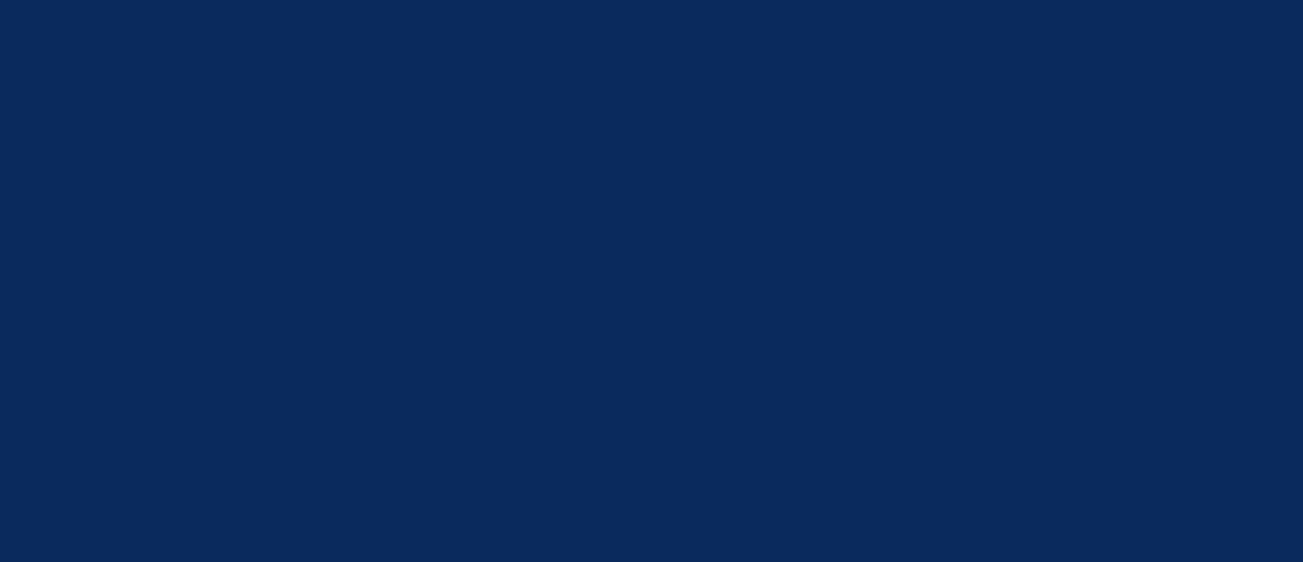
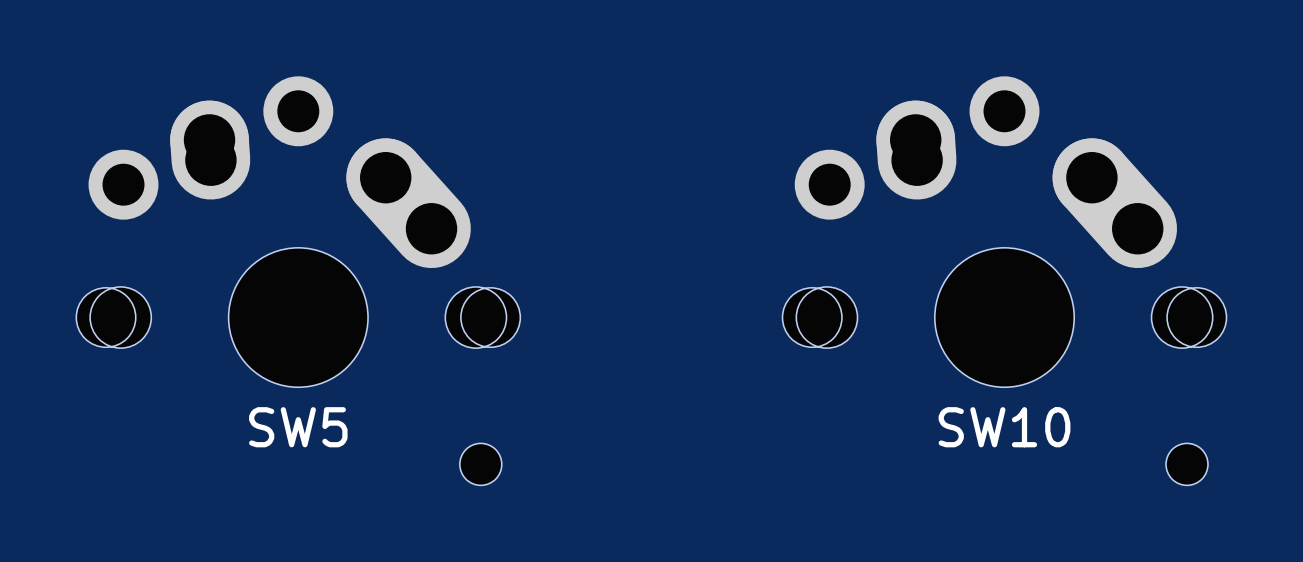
SW5: none -> (298, 280)
SW10: none -> (1004, 280)

